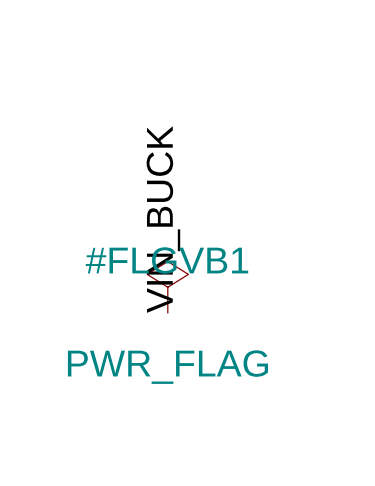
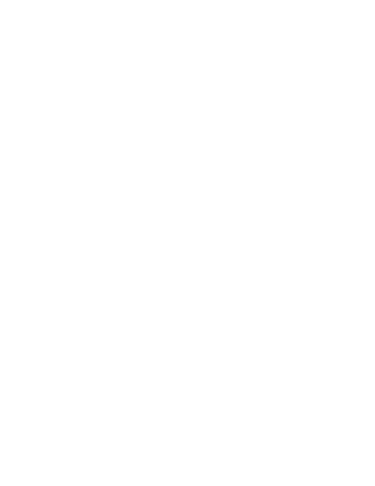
label: VIN_BUCK (163, 219) -> none
#FLGVB1: PWR_FLAG (167, 287) -> none

